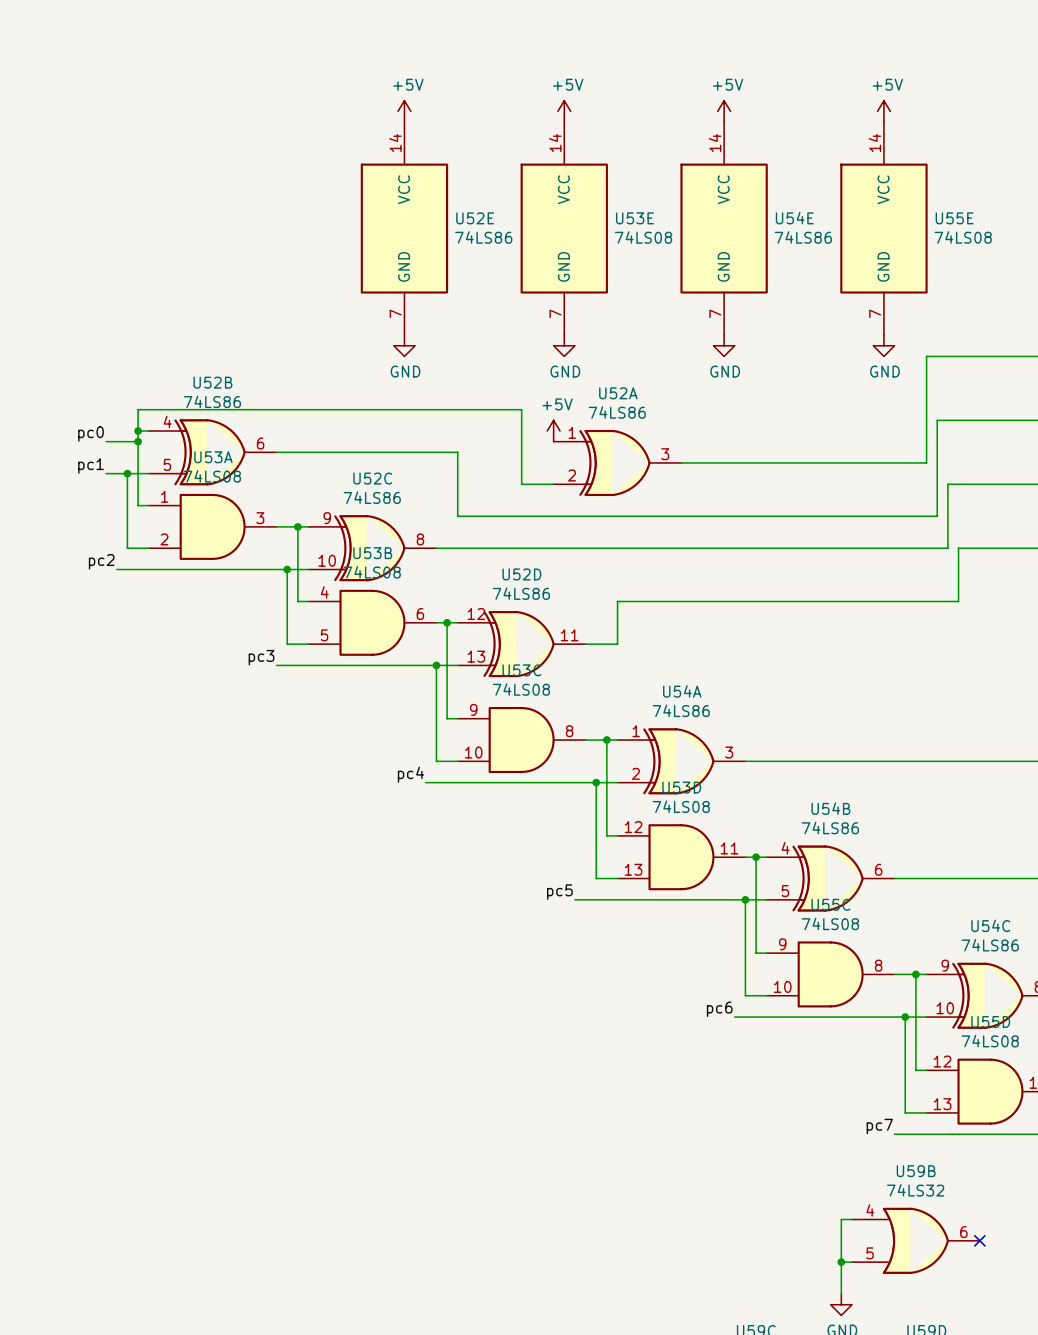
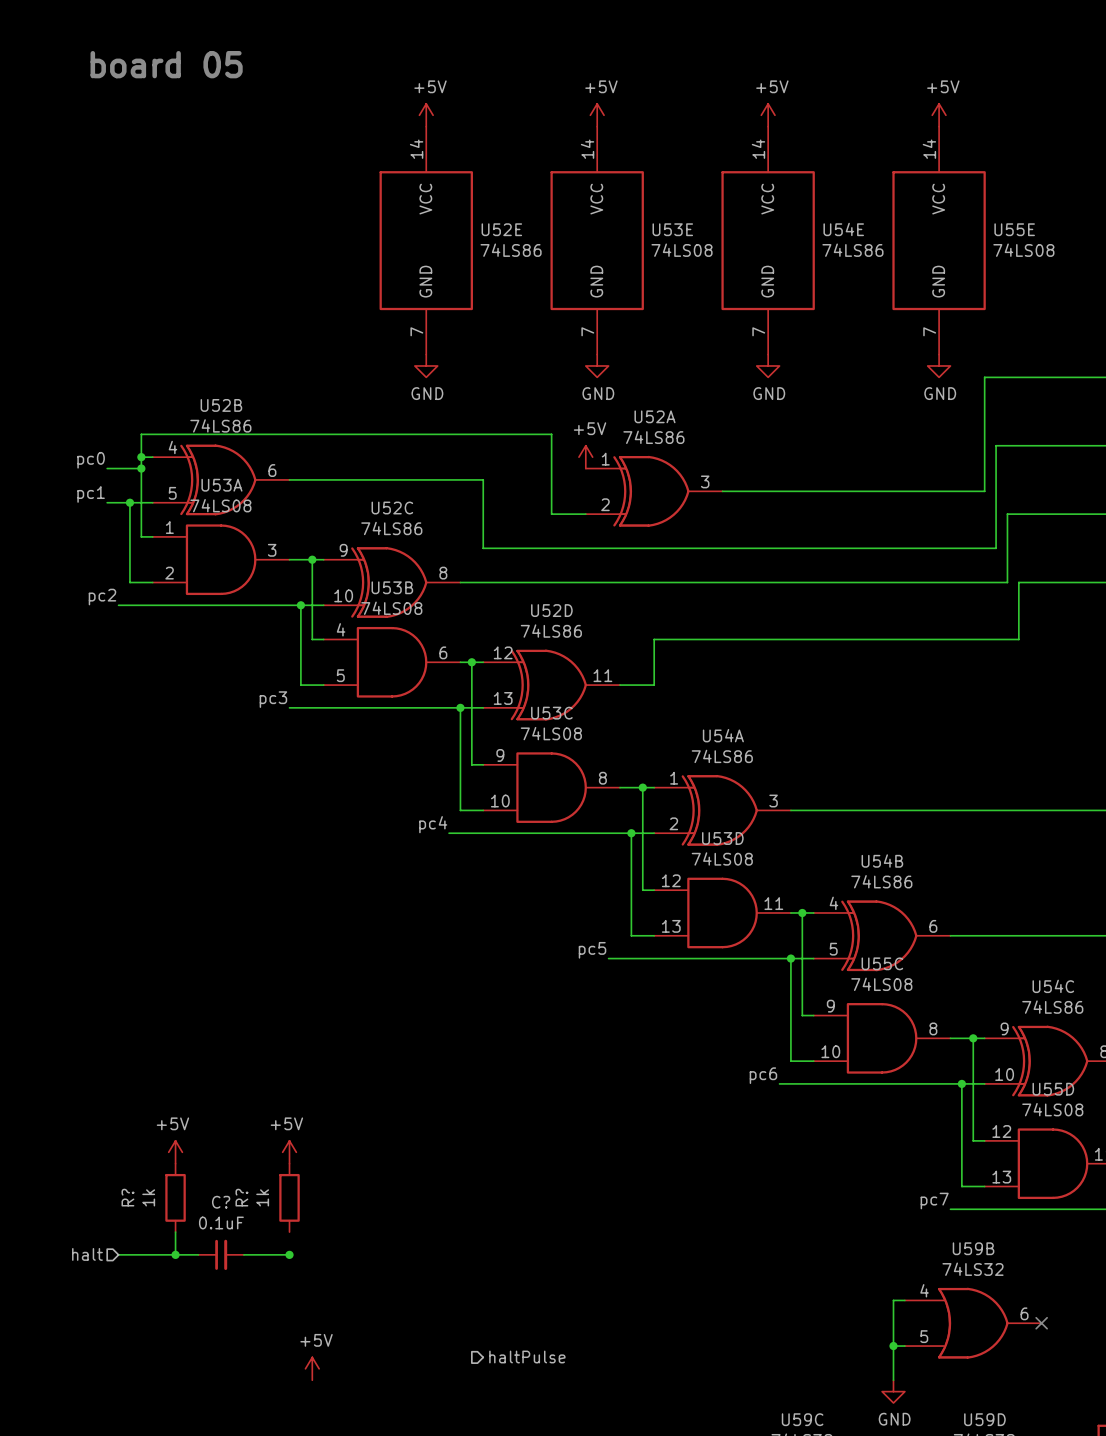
text: none -> board 05 (166, 64)
power symbol: none -> +5V (175, 1152)
power symbol: none -> +5V (289, 1152)
R?: none -> 1k (175, 1197)
R?: none -> 1k (289, 1197)
wire: none -> (175, 1232) (175, 1254)
hierarchical label: none -> halt (87, 1254)
wire: none -> (118, 1254) (198, 1254)
junction: none -> (175, 1254)
C?: none -> 0.1uF (221, 1254)
wire: none -> (243, 1254) (289, 1254)
junction: none -> (289, 1254)
hierarchical label: none -> haltPulse (527, 1357)
power symbol: none -> +5V (312, 1368)

